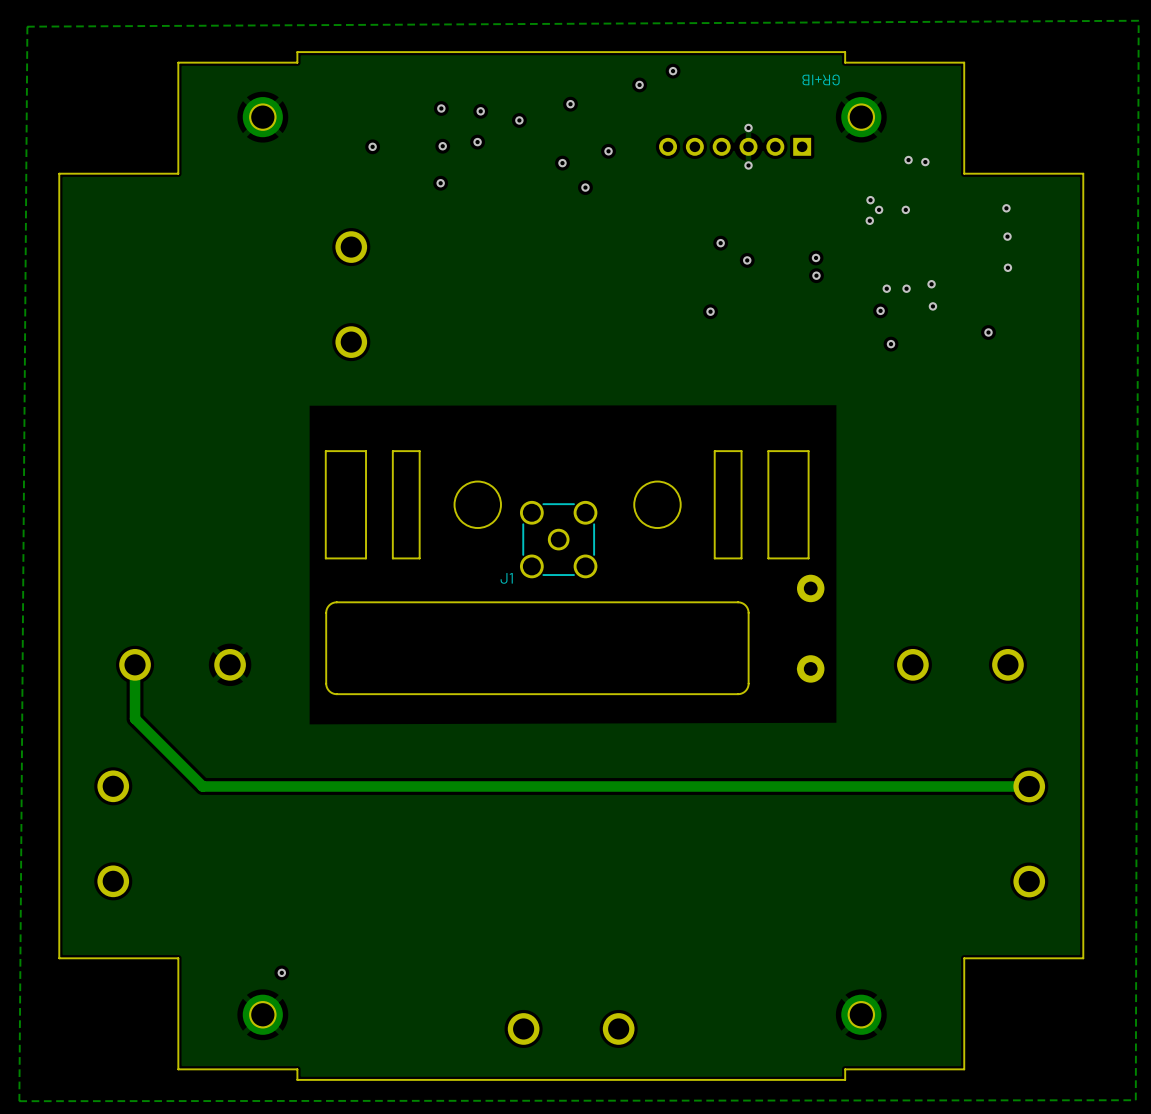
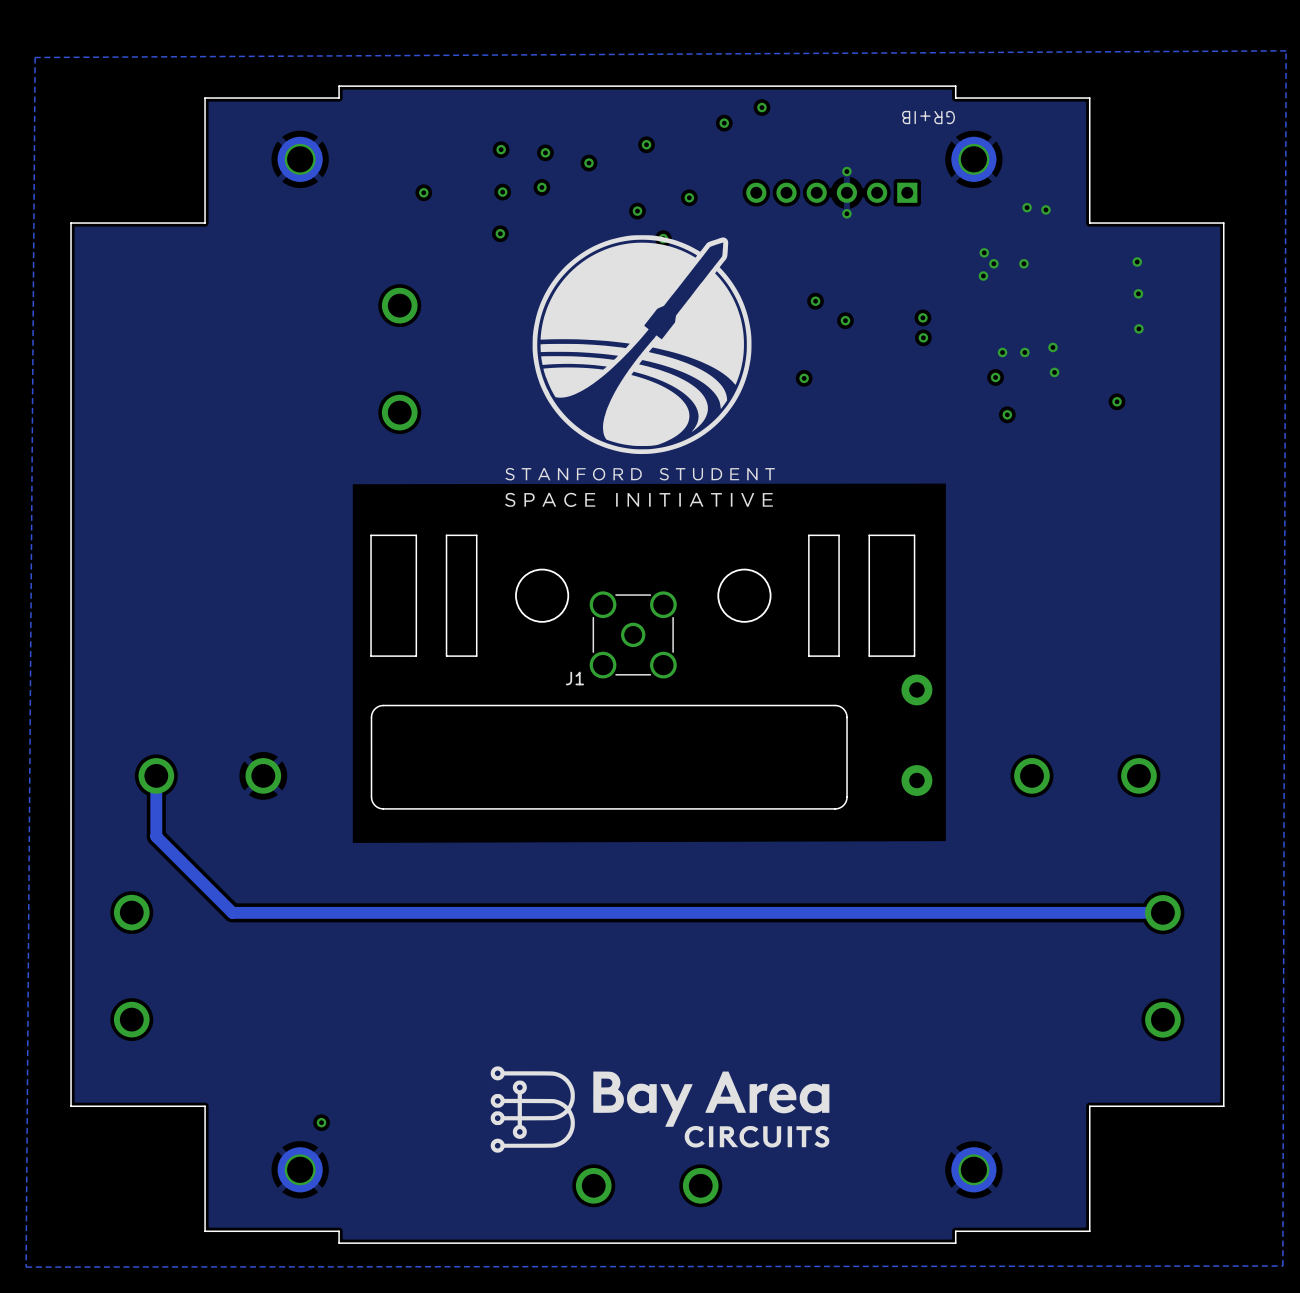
drawing: none -> [505, 235, 775, 507]
drawing: none -> [490, 1066, 830, 1153]

